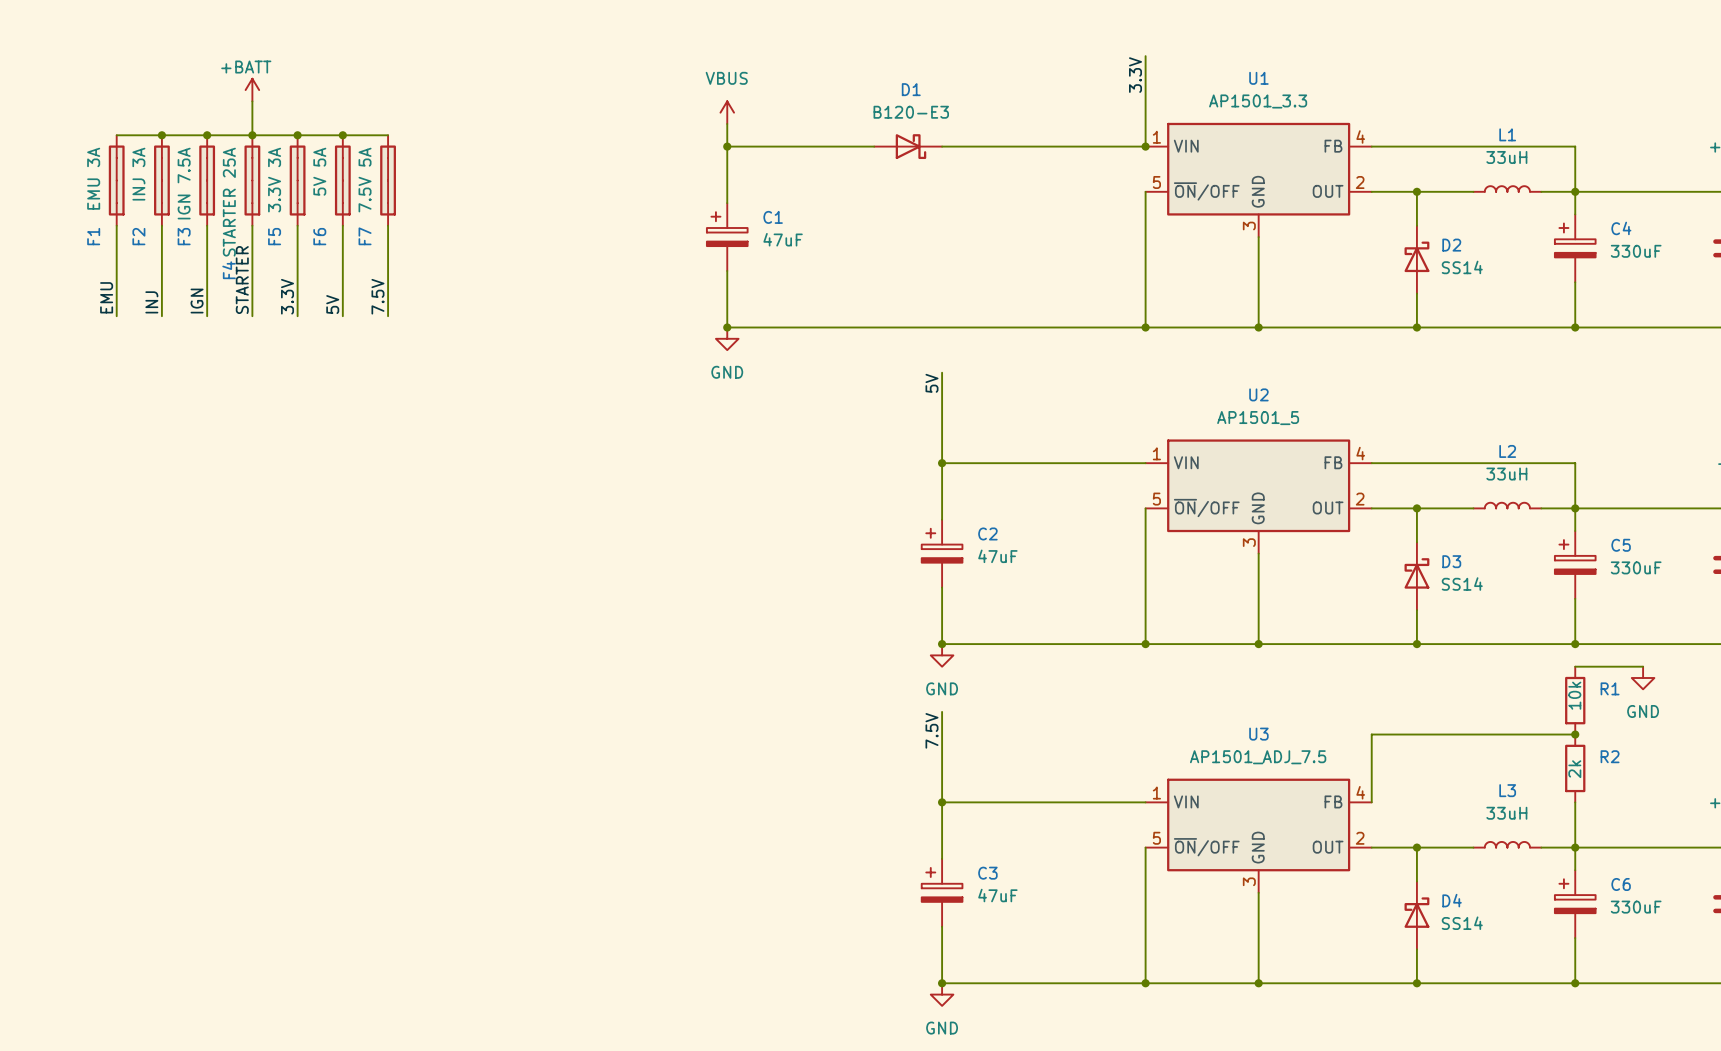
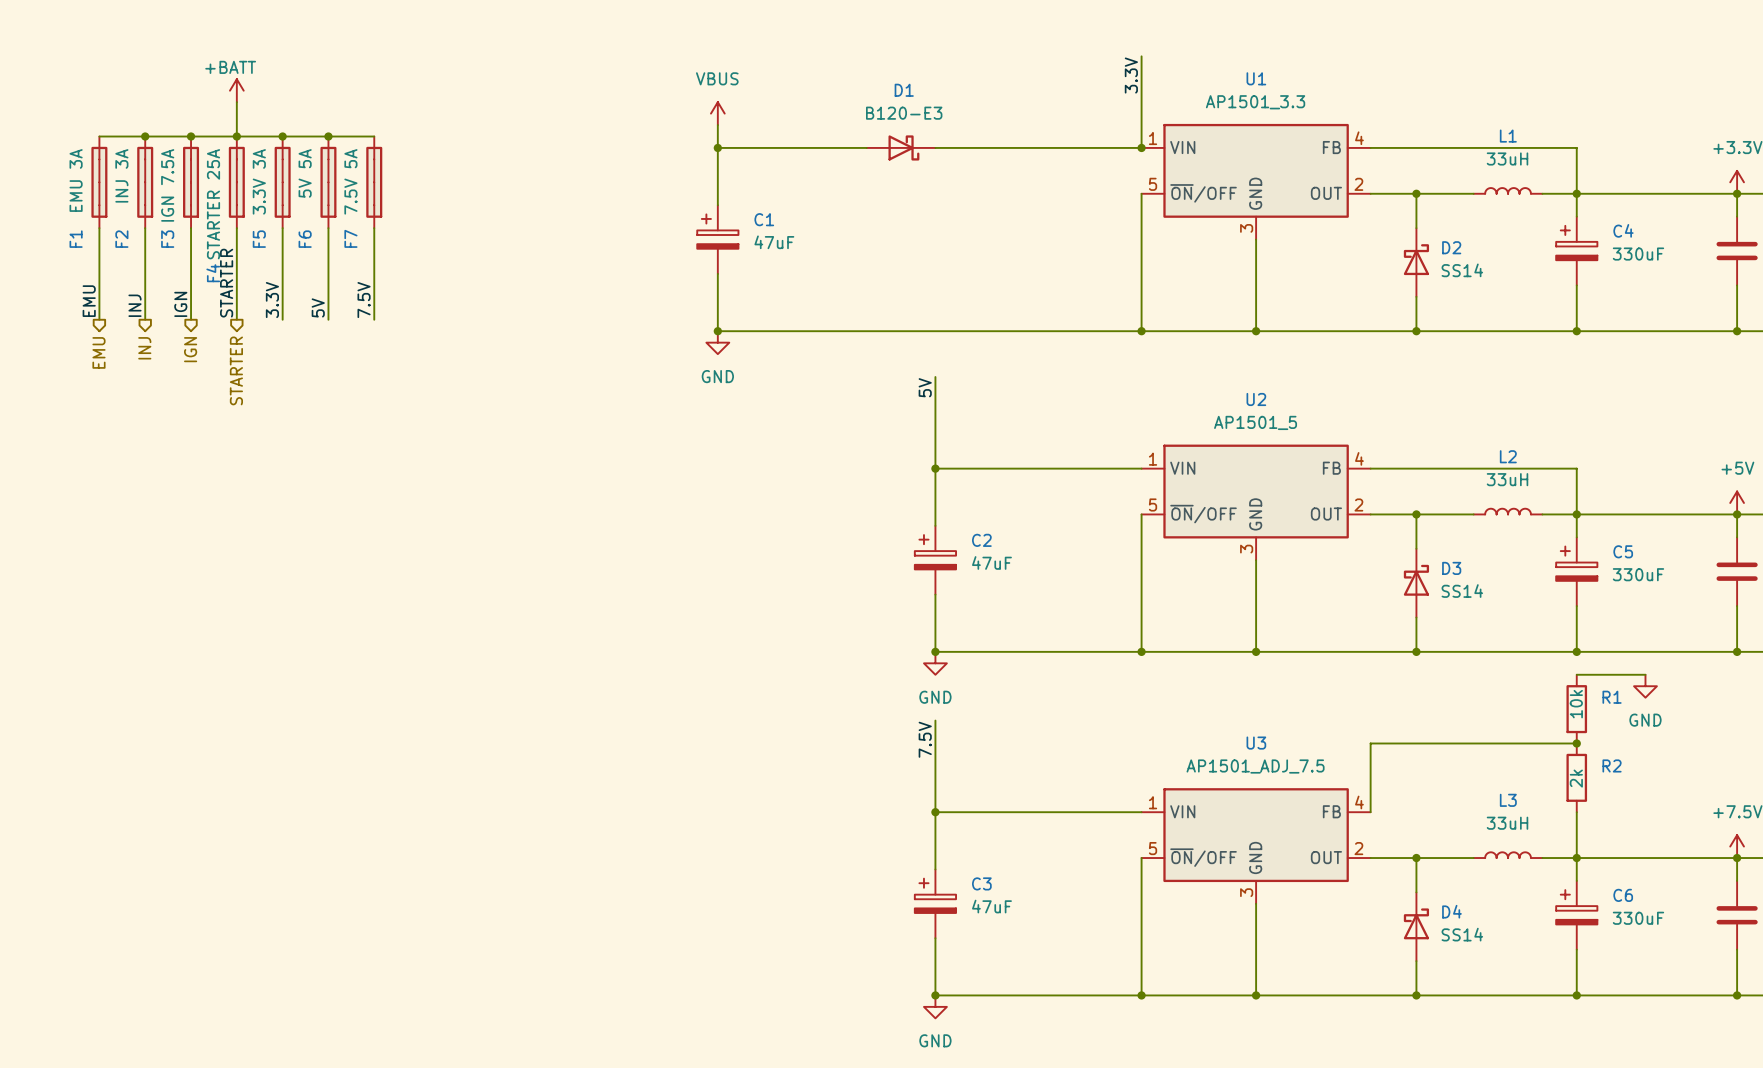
hierarchical label: none -> INJ (144, 348)
hierarchical label: none -> IGN (190, 349)
hierarchical label: none -> EMU (98, 352)
hierarchical label: none -> STARTER (236, 370)

